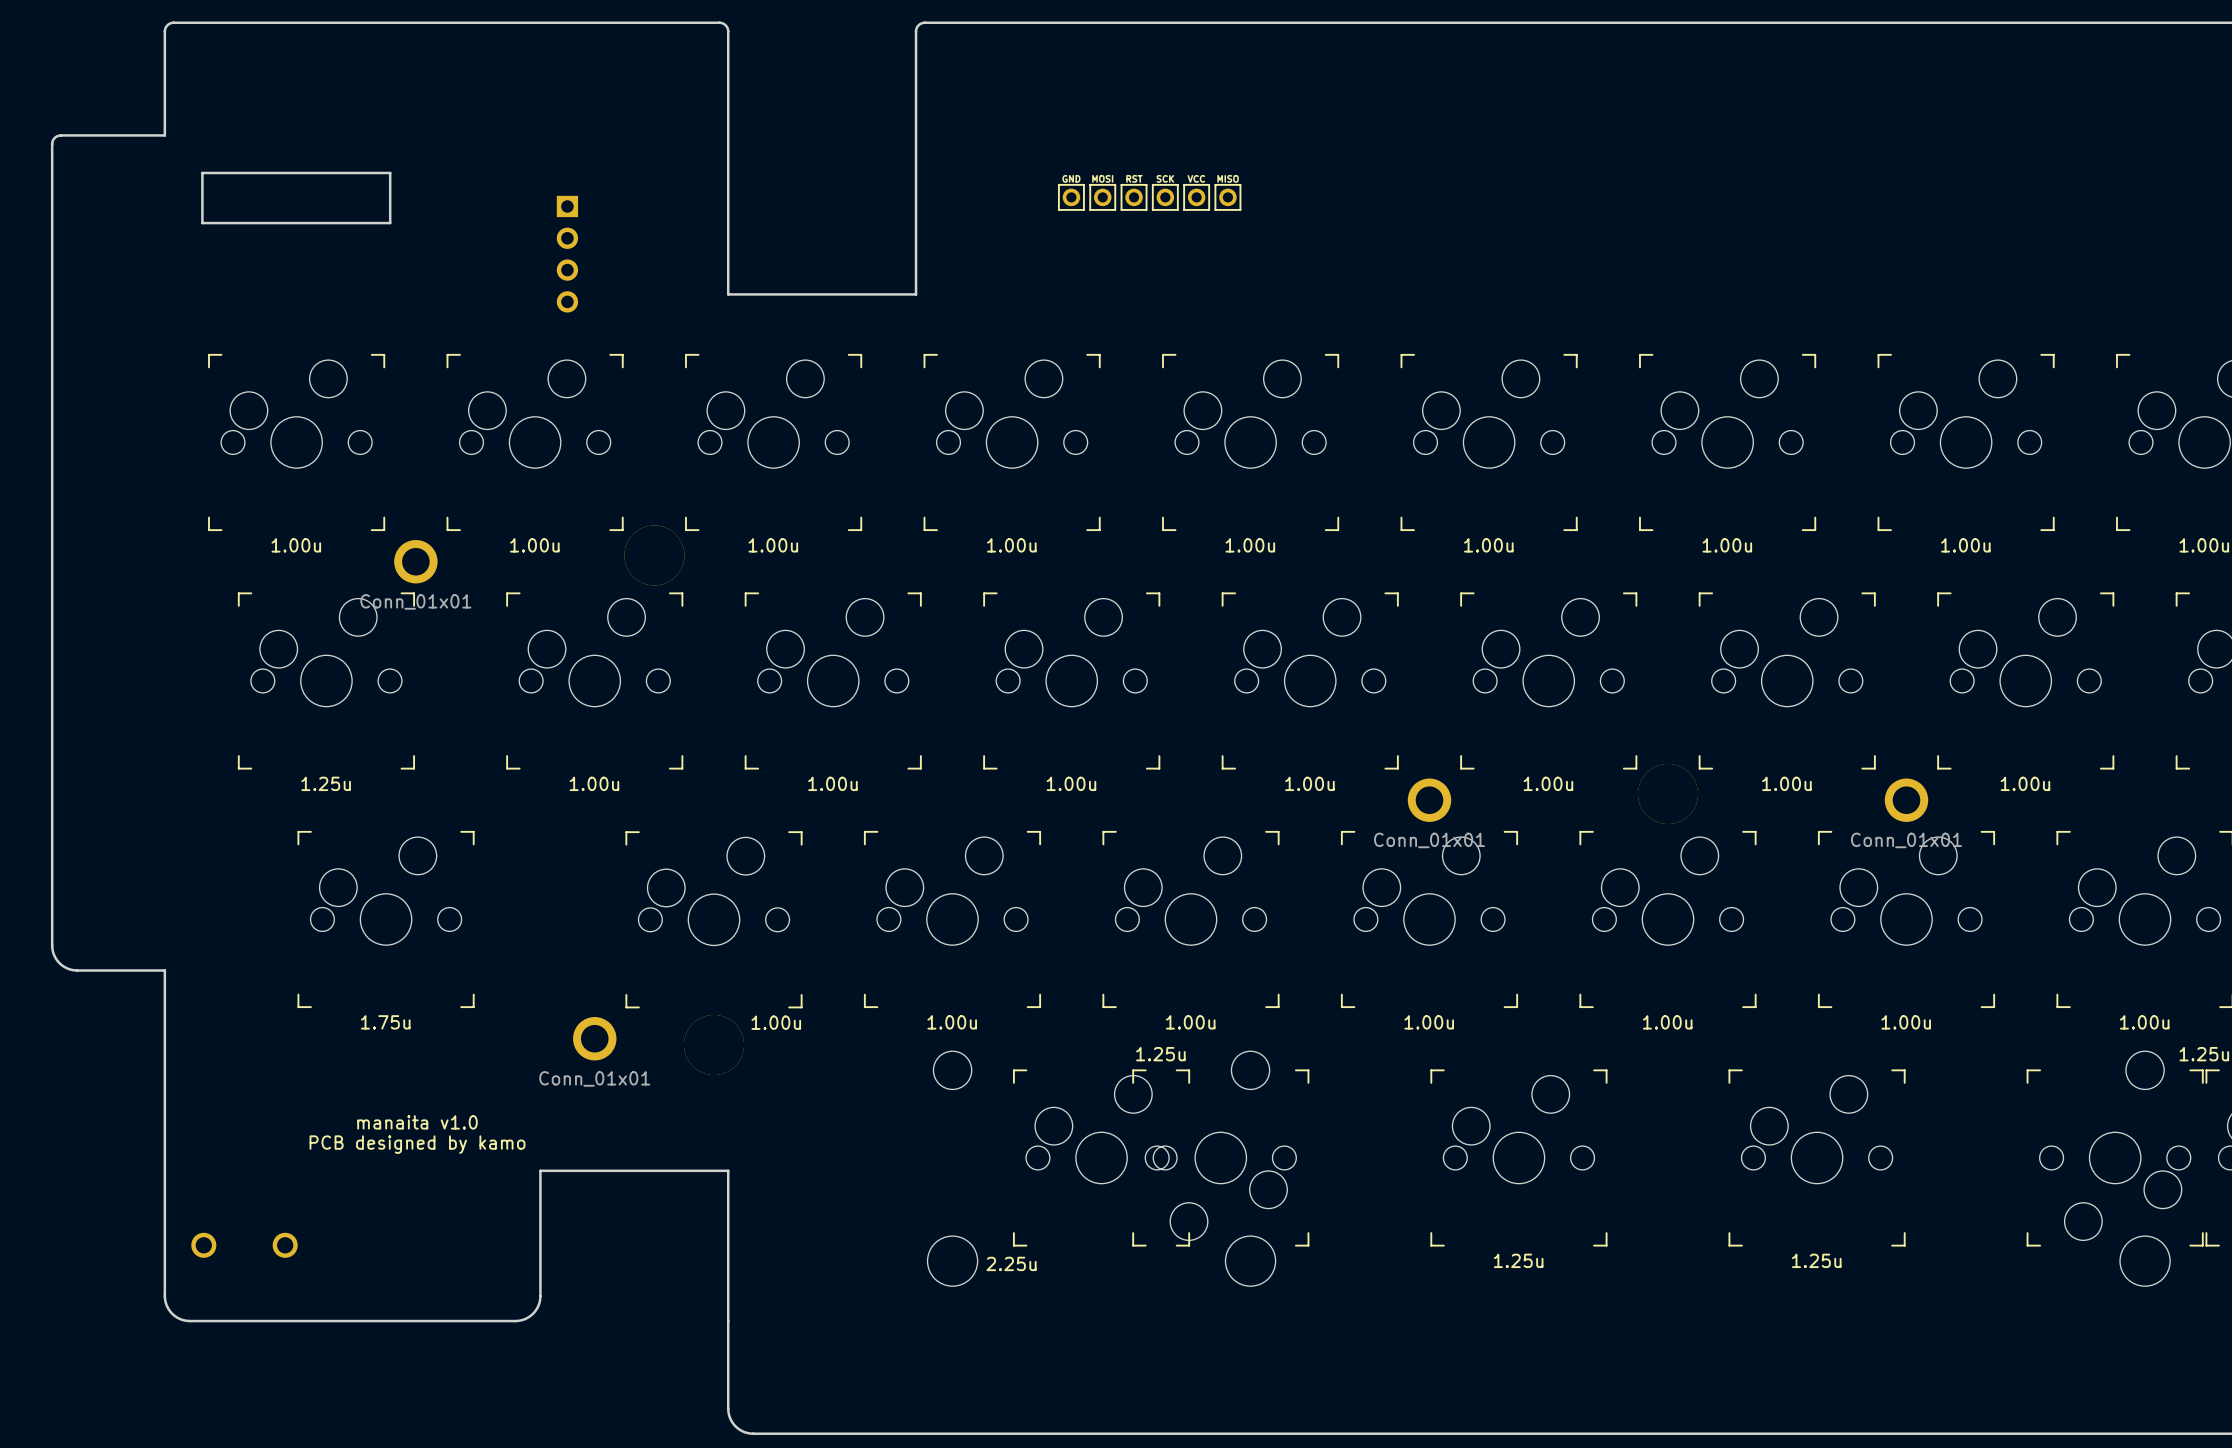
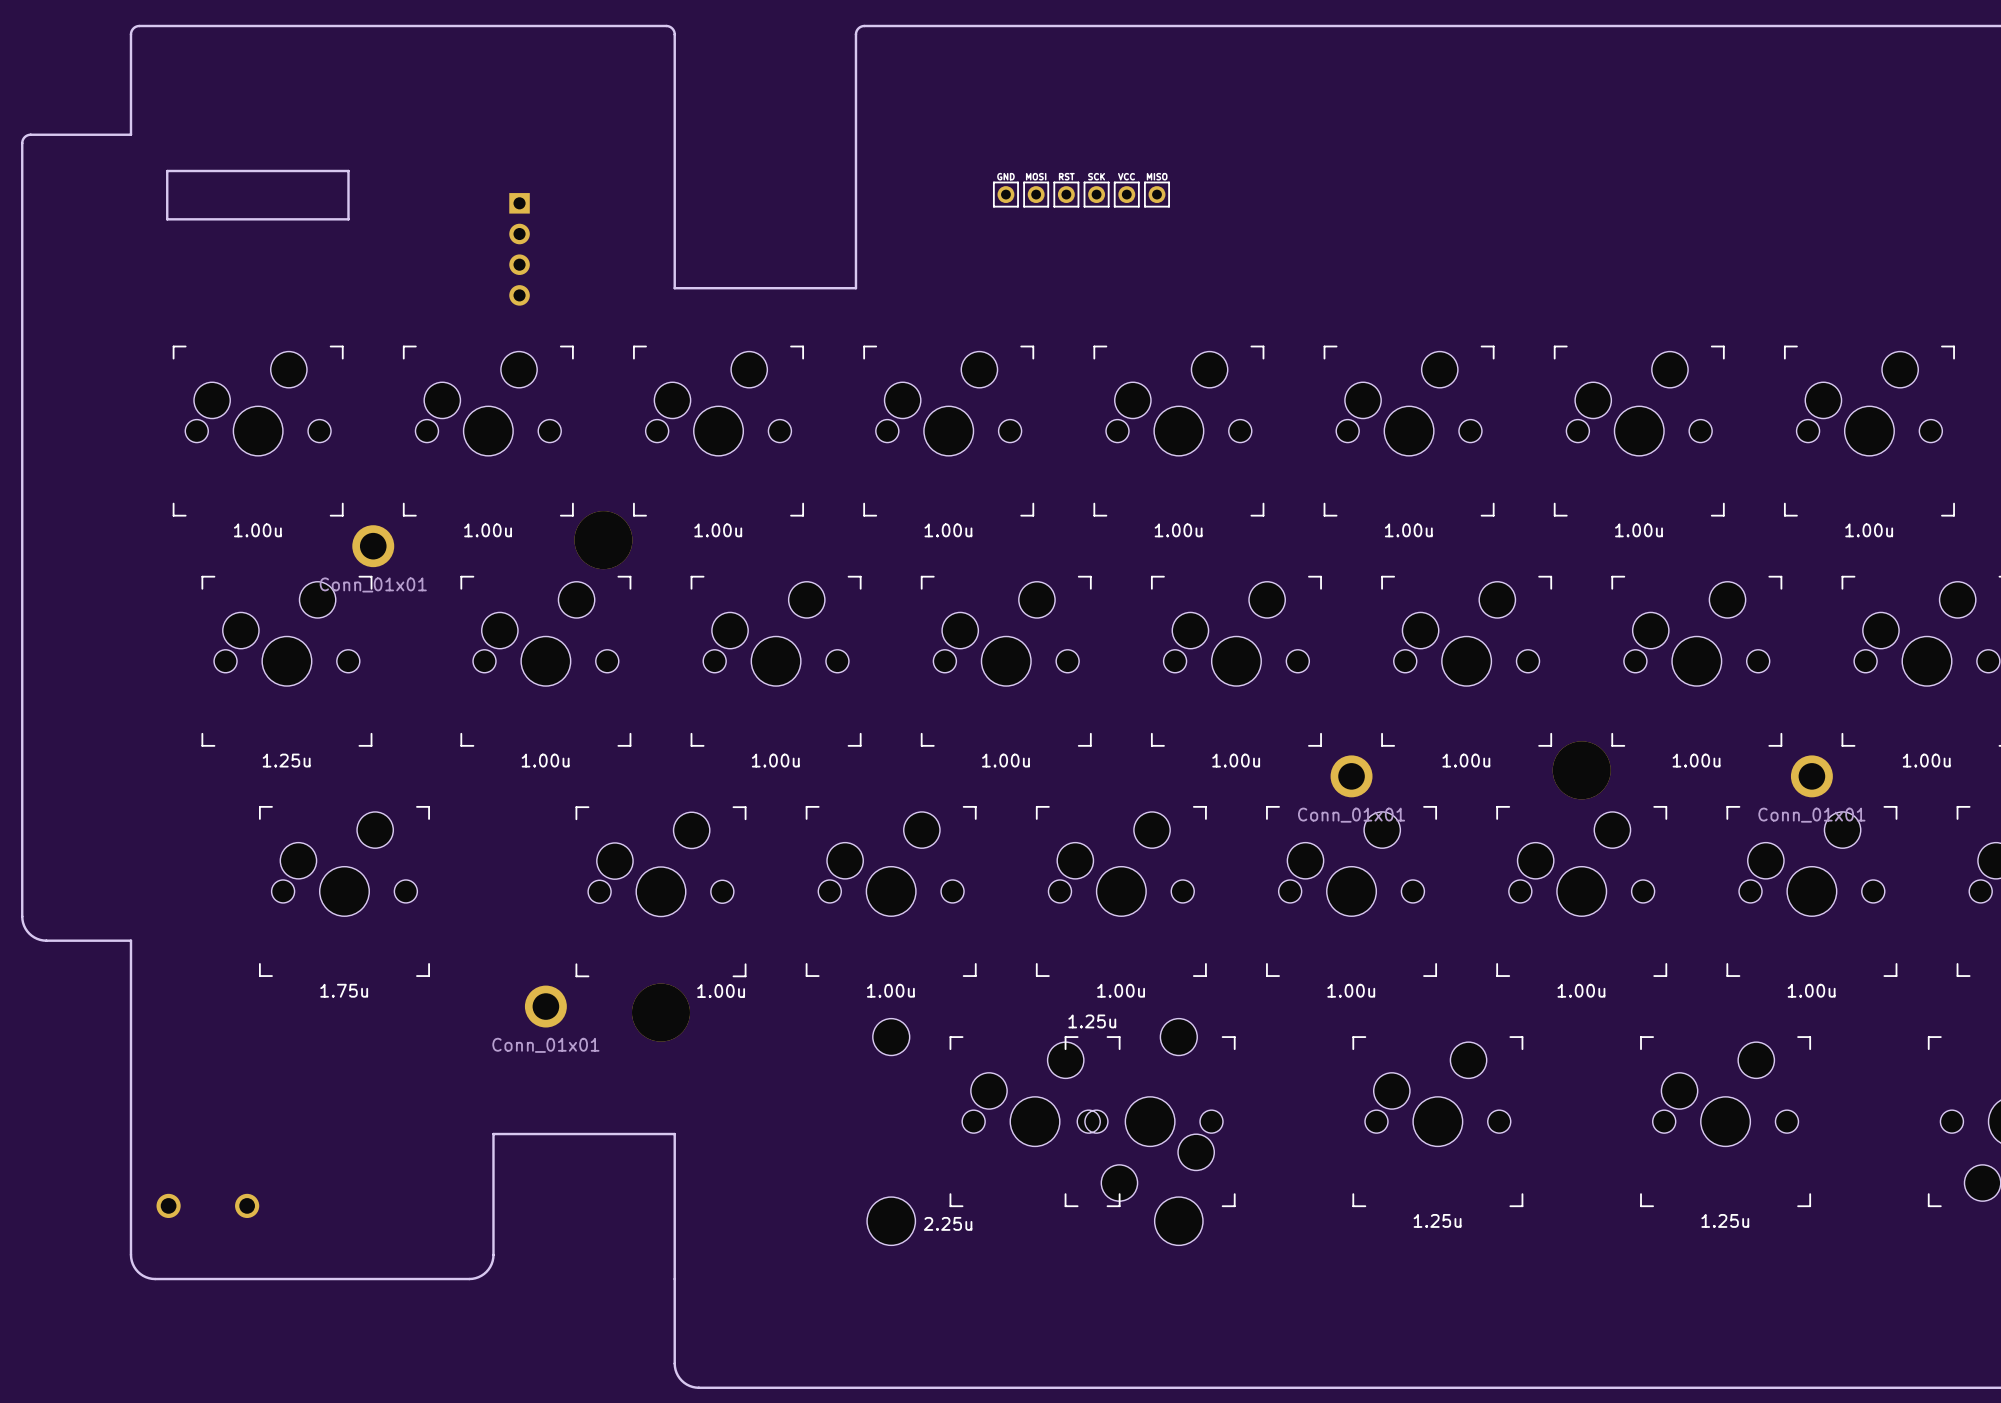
text: manaita v1.0 (417, 1122) -> none
text: PCB designed by kamo (417, 1144) -> none

